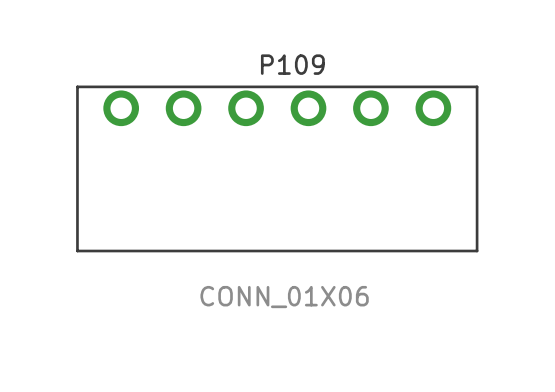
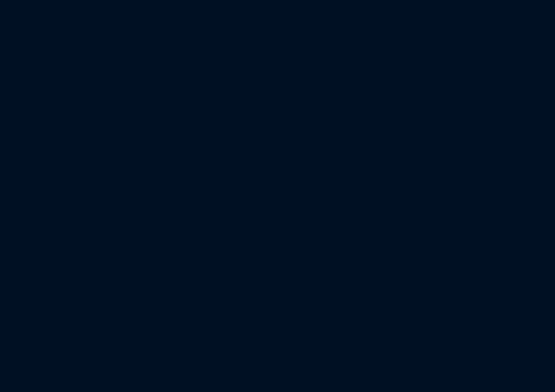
P109: CONN_01X06 (277, 168) -> none

